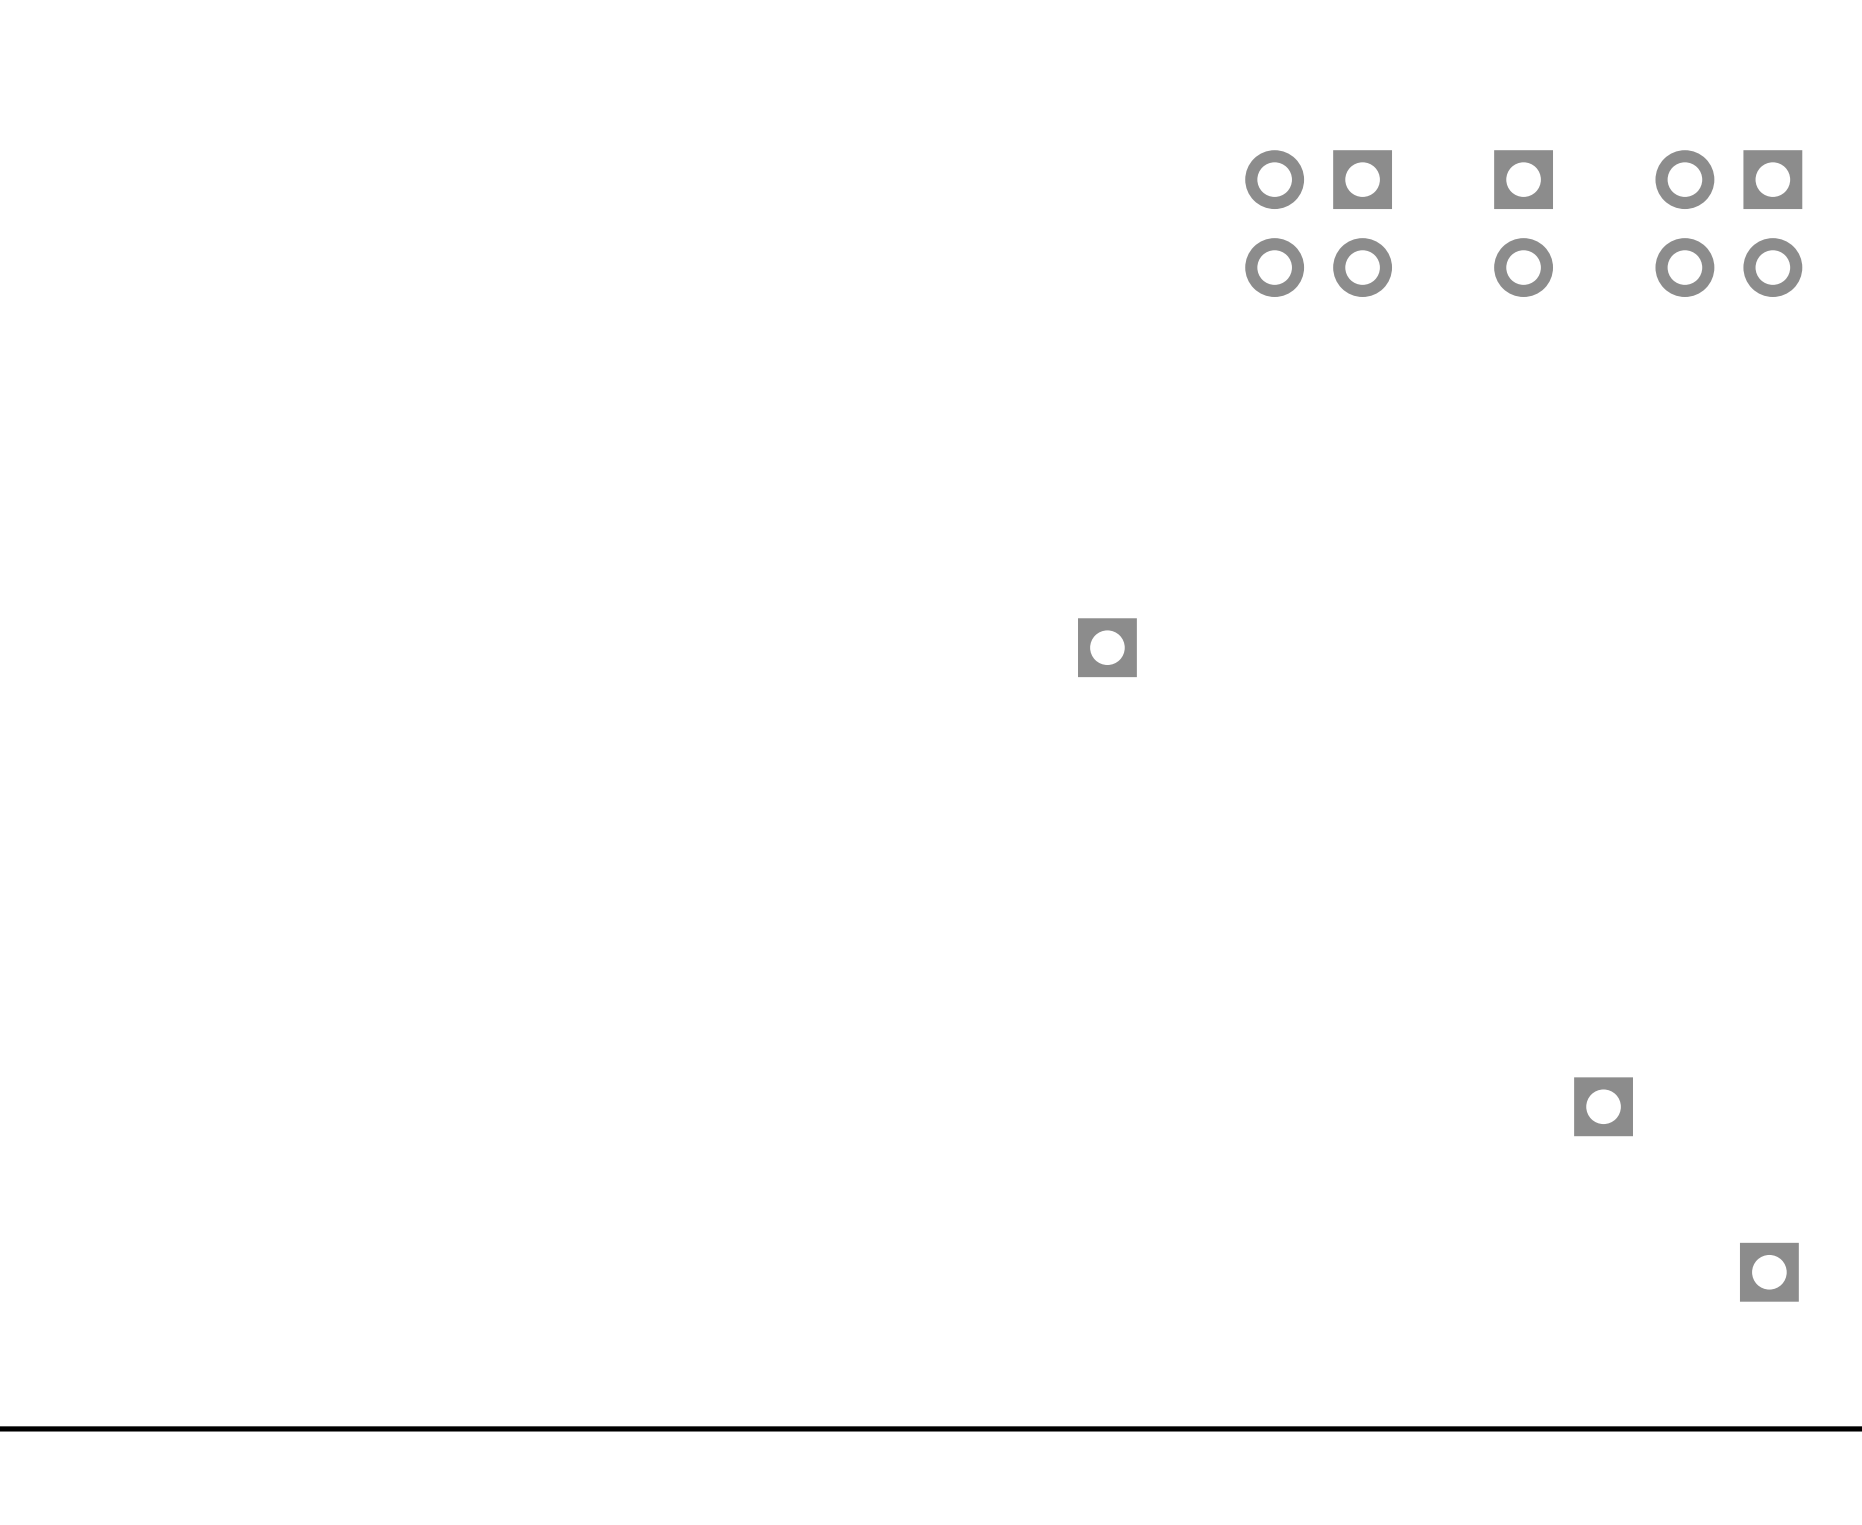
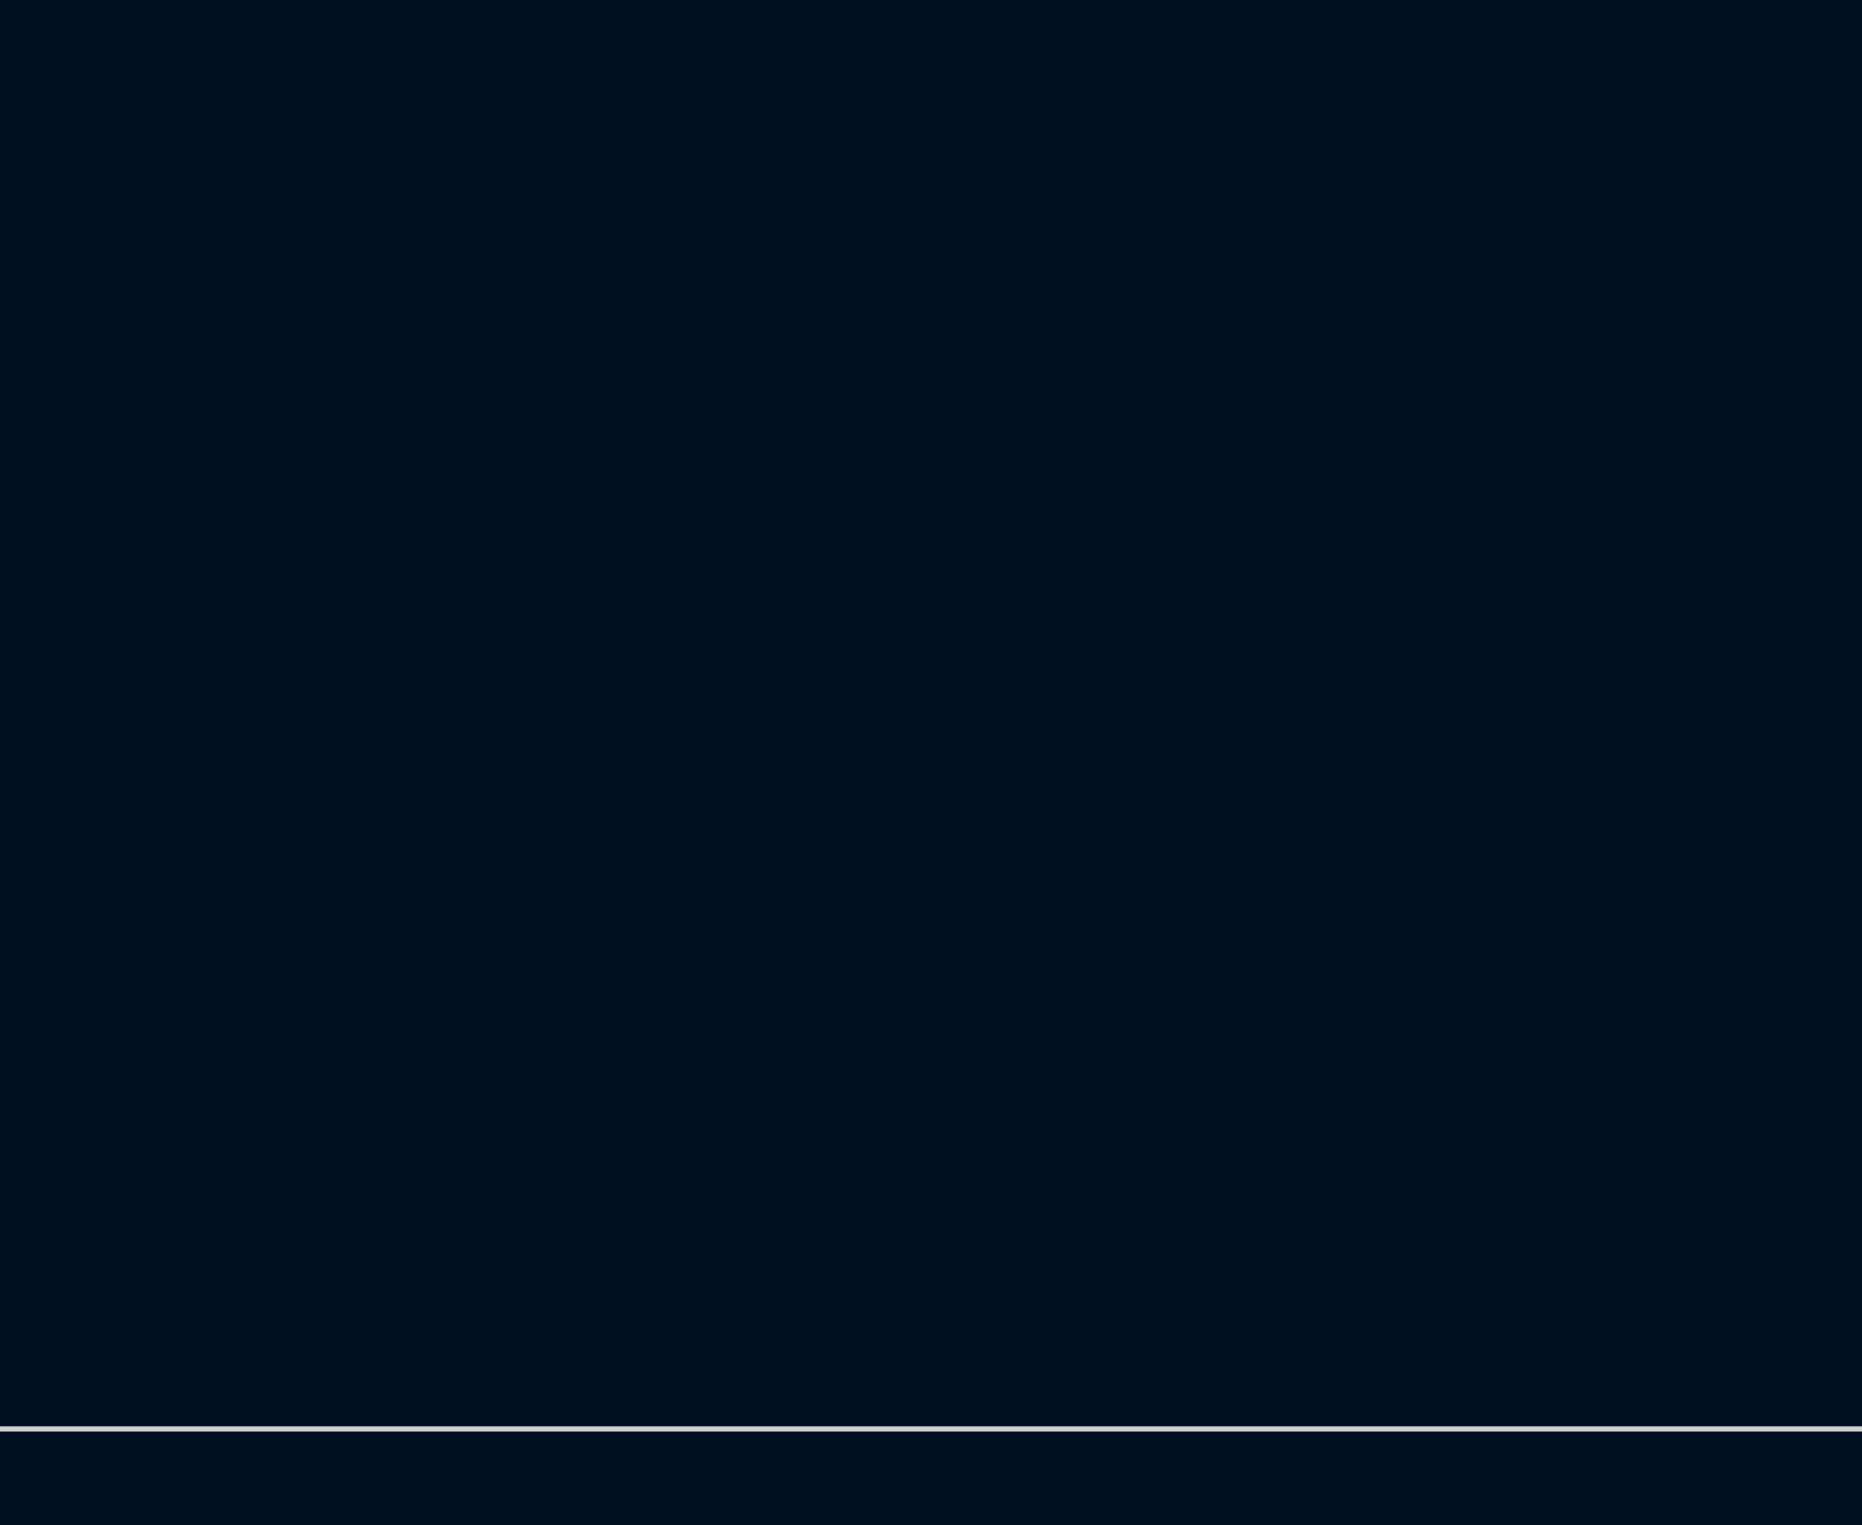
part: (1318, 223) -> none
part: (1523, 223) -> none
part: (1728, 223) -> none
part: (1107, 647) -> none
part: (1603, 1106) -> none
part: (1769, 1272) -> none

